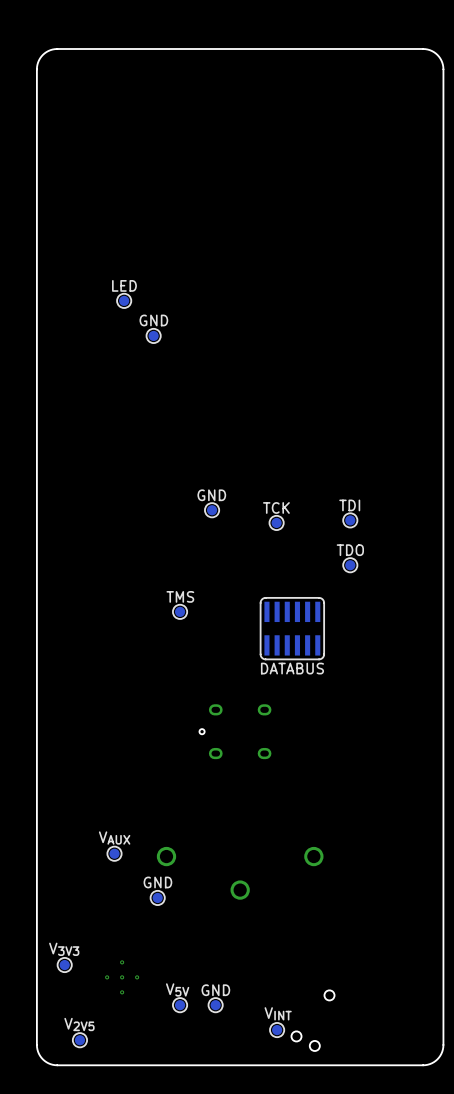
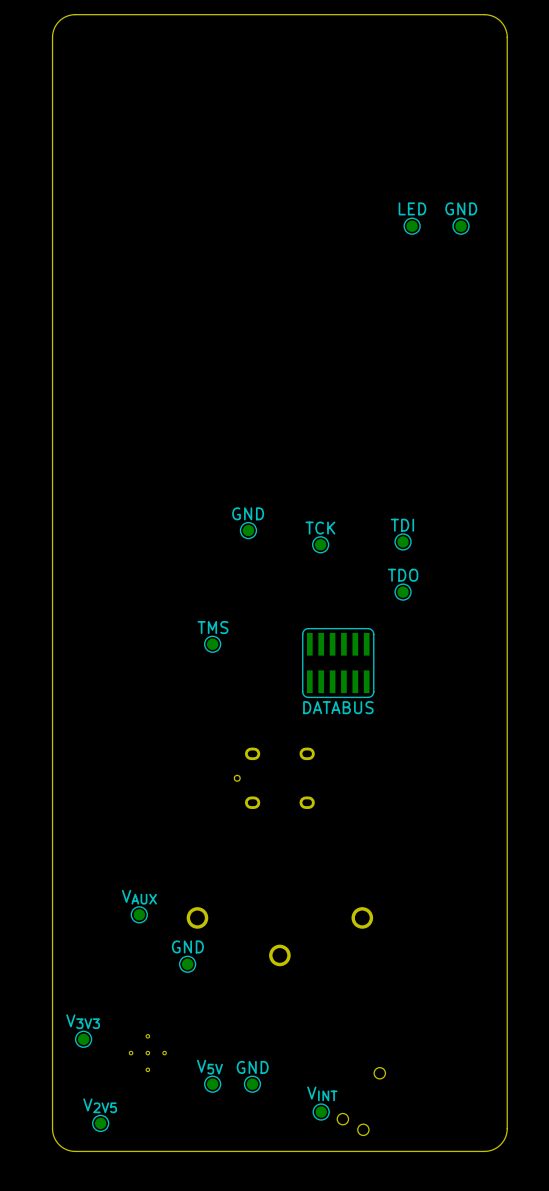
text: none -> GND (461, 208)
part: none -> (412, 226)
part: none -> (461, 226)
text position: LED (124, 285) -> LED (412, 208)
part: (124, 300) -> none
text: GND (153, 320) -> none
part: (153, 335) -> none

